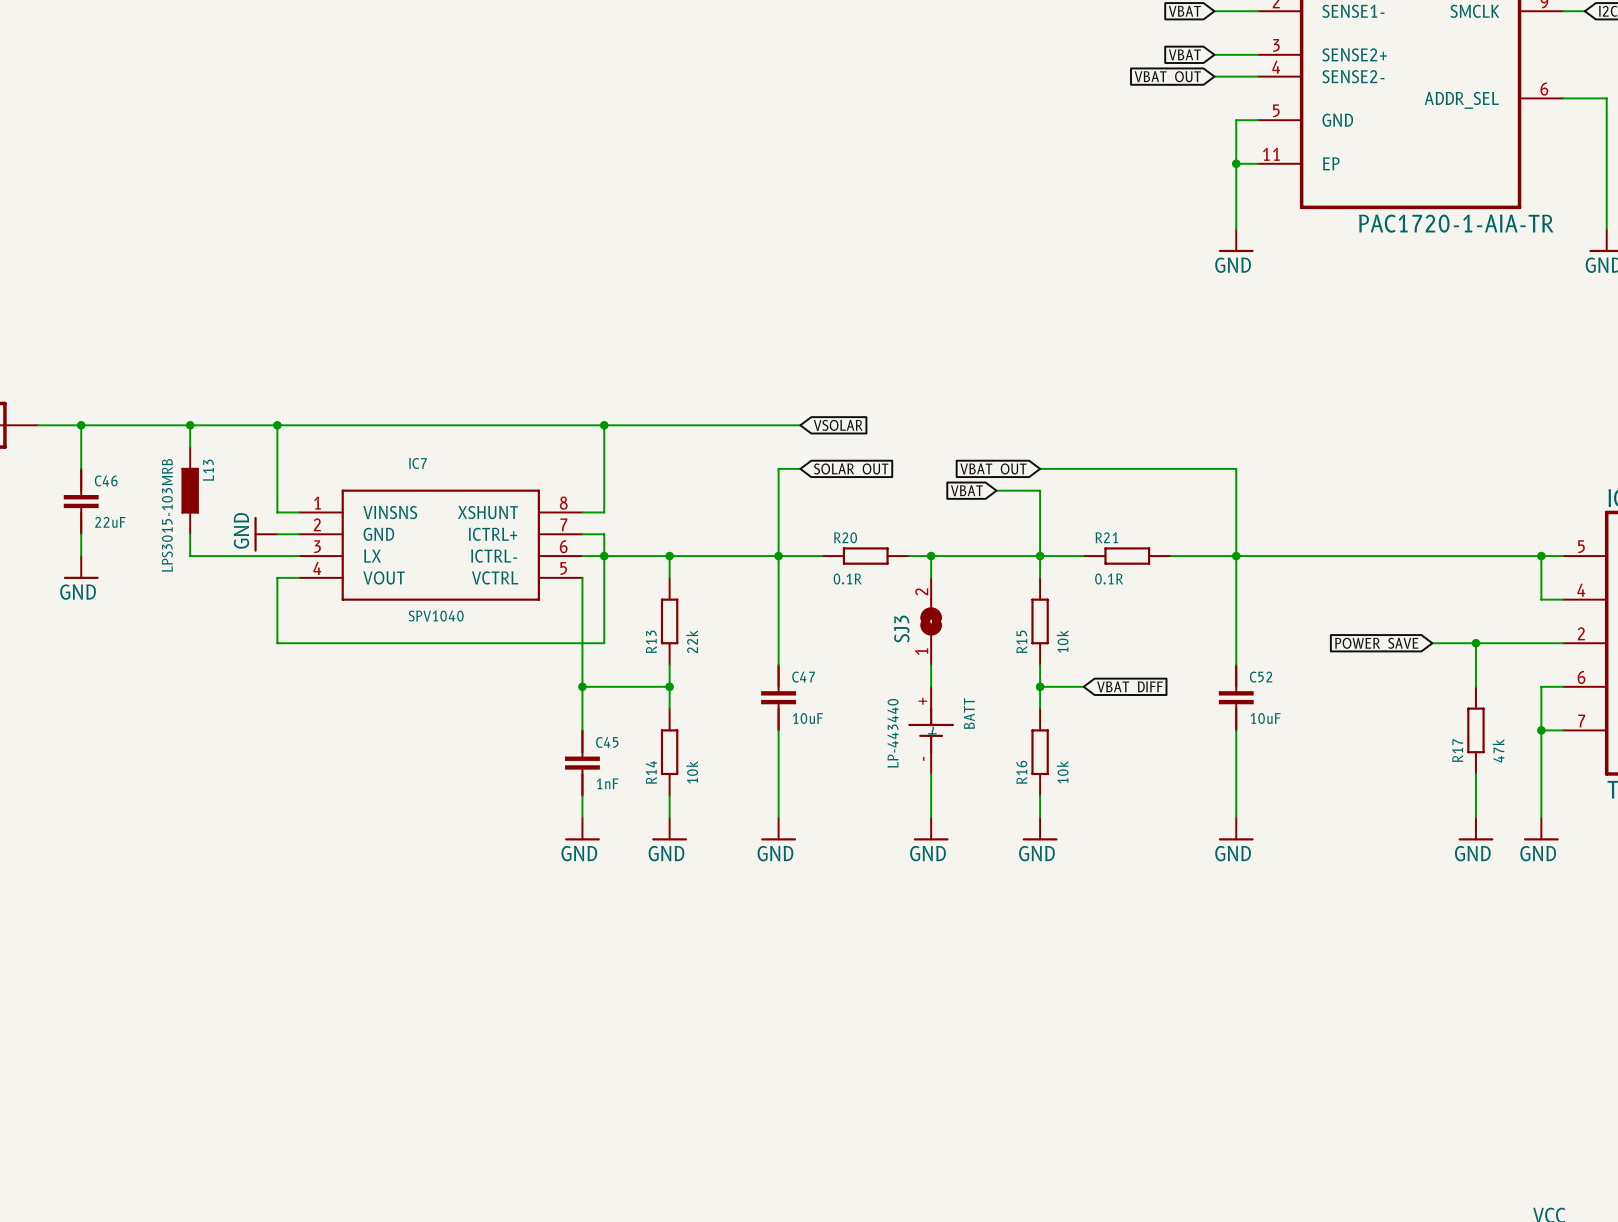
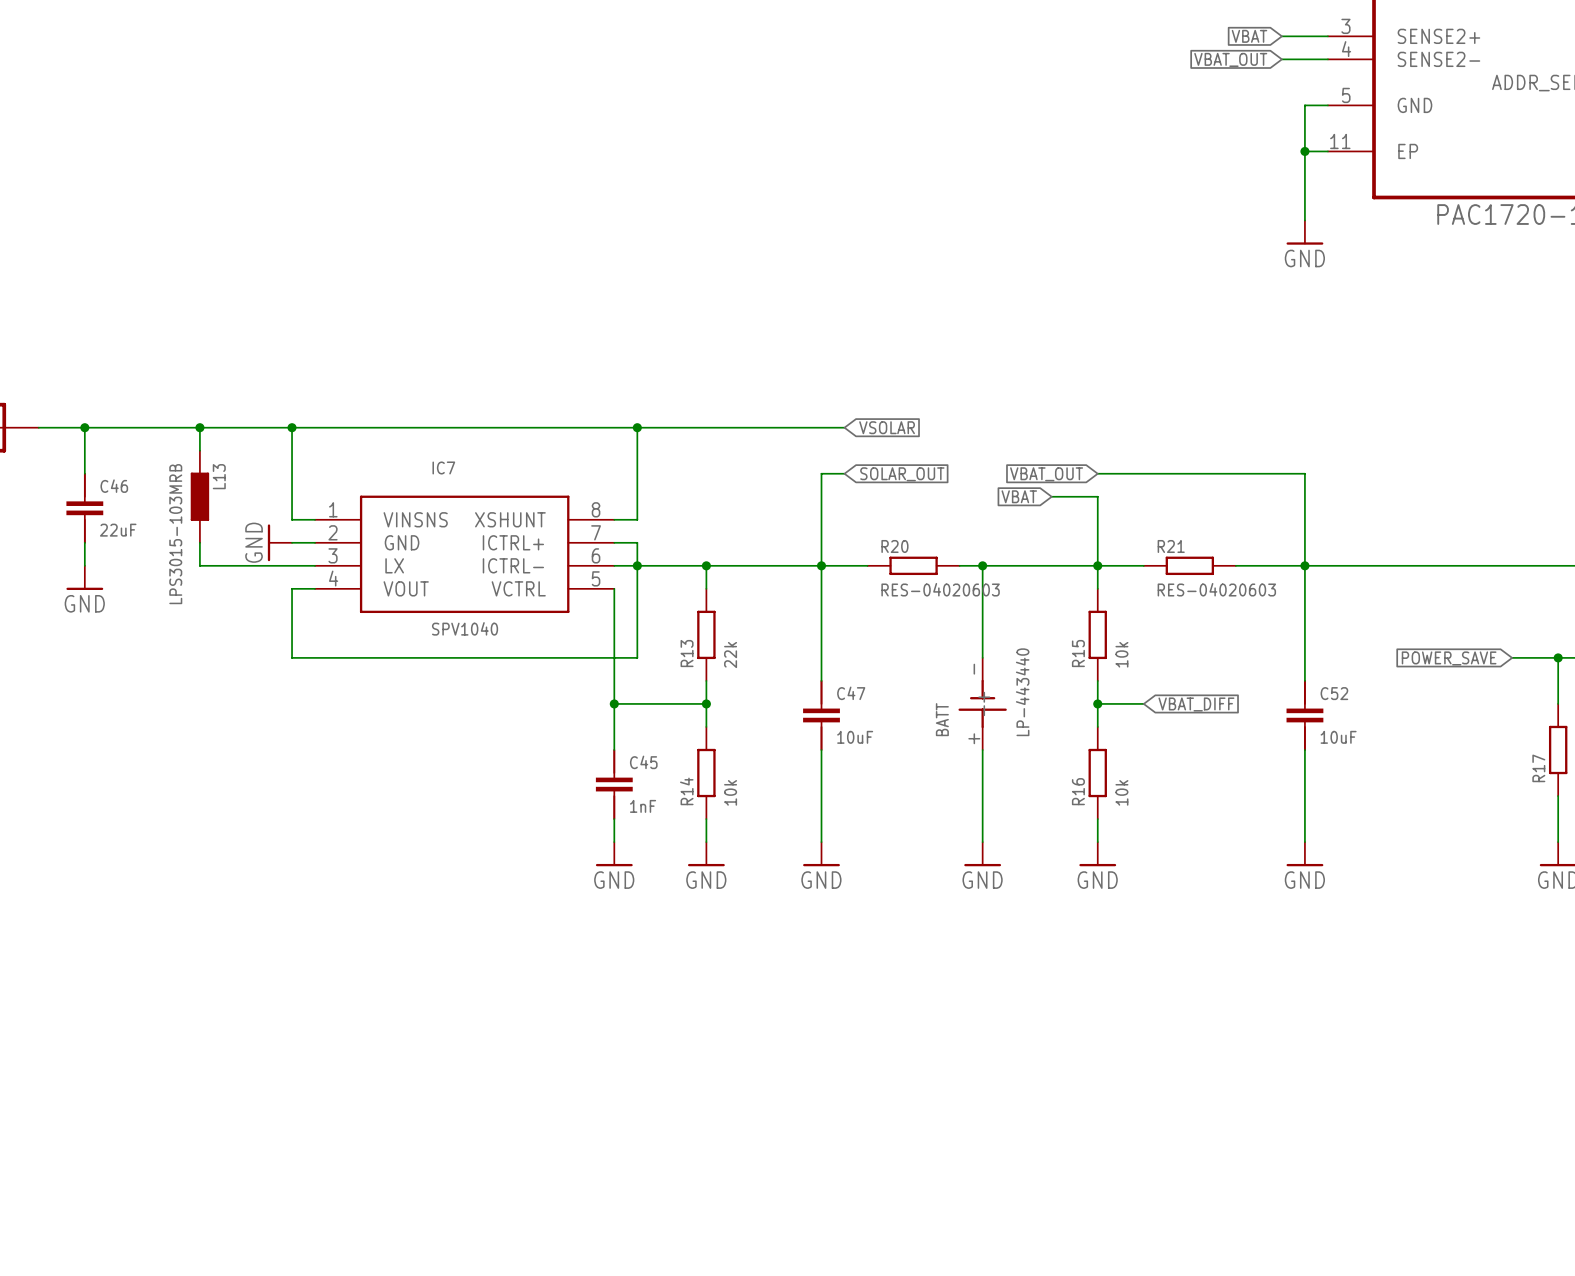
R20 value: 0.1R (847, 579) -> RES-04020603 (940, 589)
R21 value: 0.1R (1109, 579) -> RES-04020603 (1216, 589)
SJ3: (931, 621) -> none
BATT rotation: 0° (931, 730) -> 180° (982, 703)

